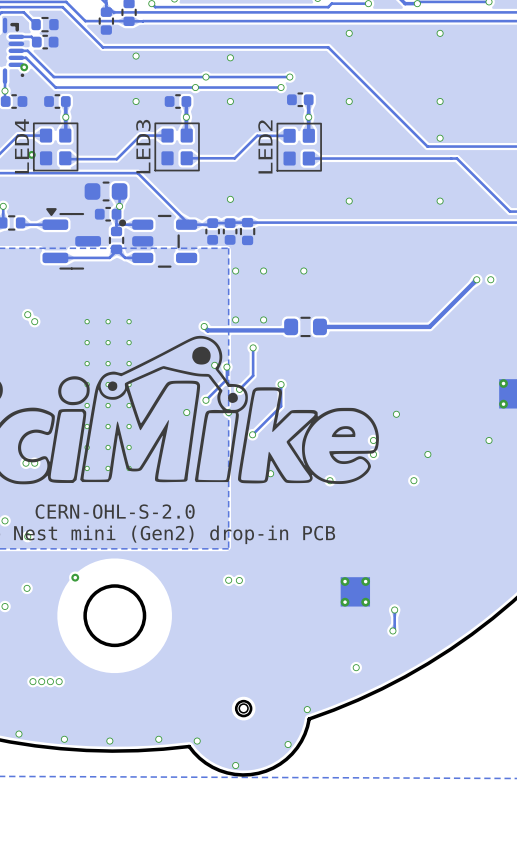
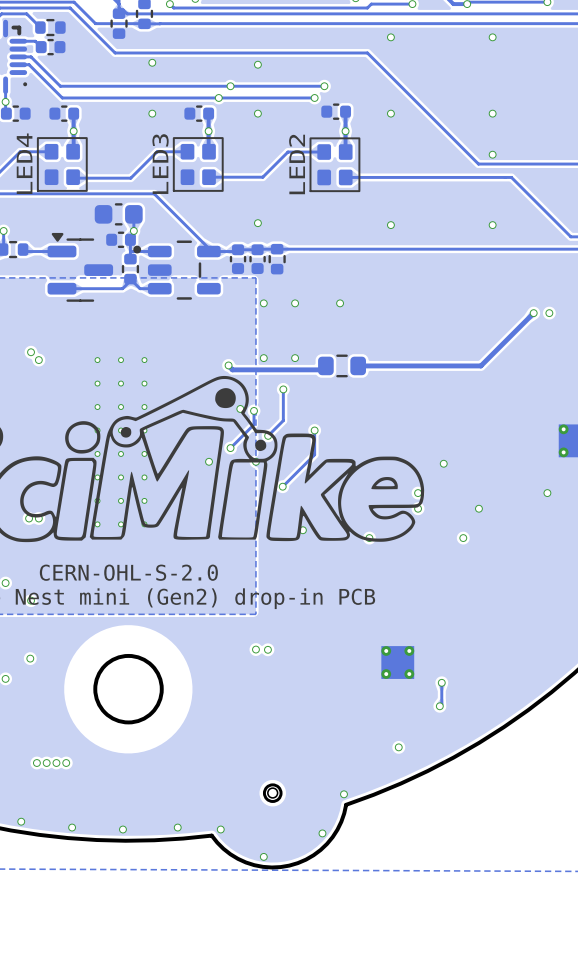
via: (24, 67) -> none
via: (31, 154) -> none
via: (75, 577) -> none

